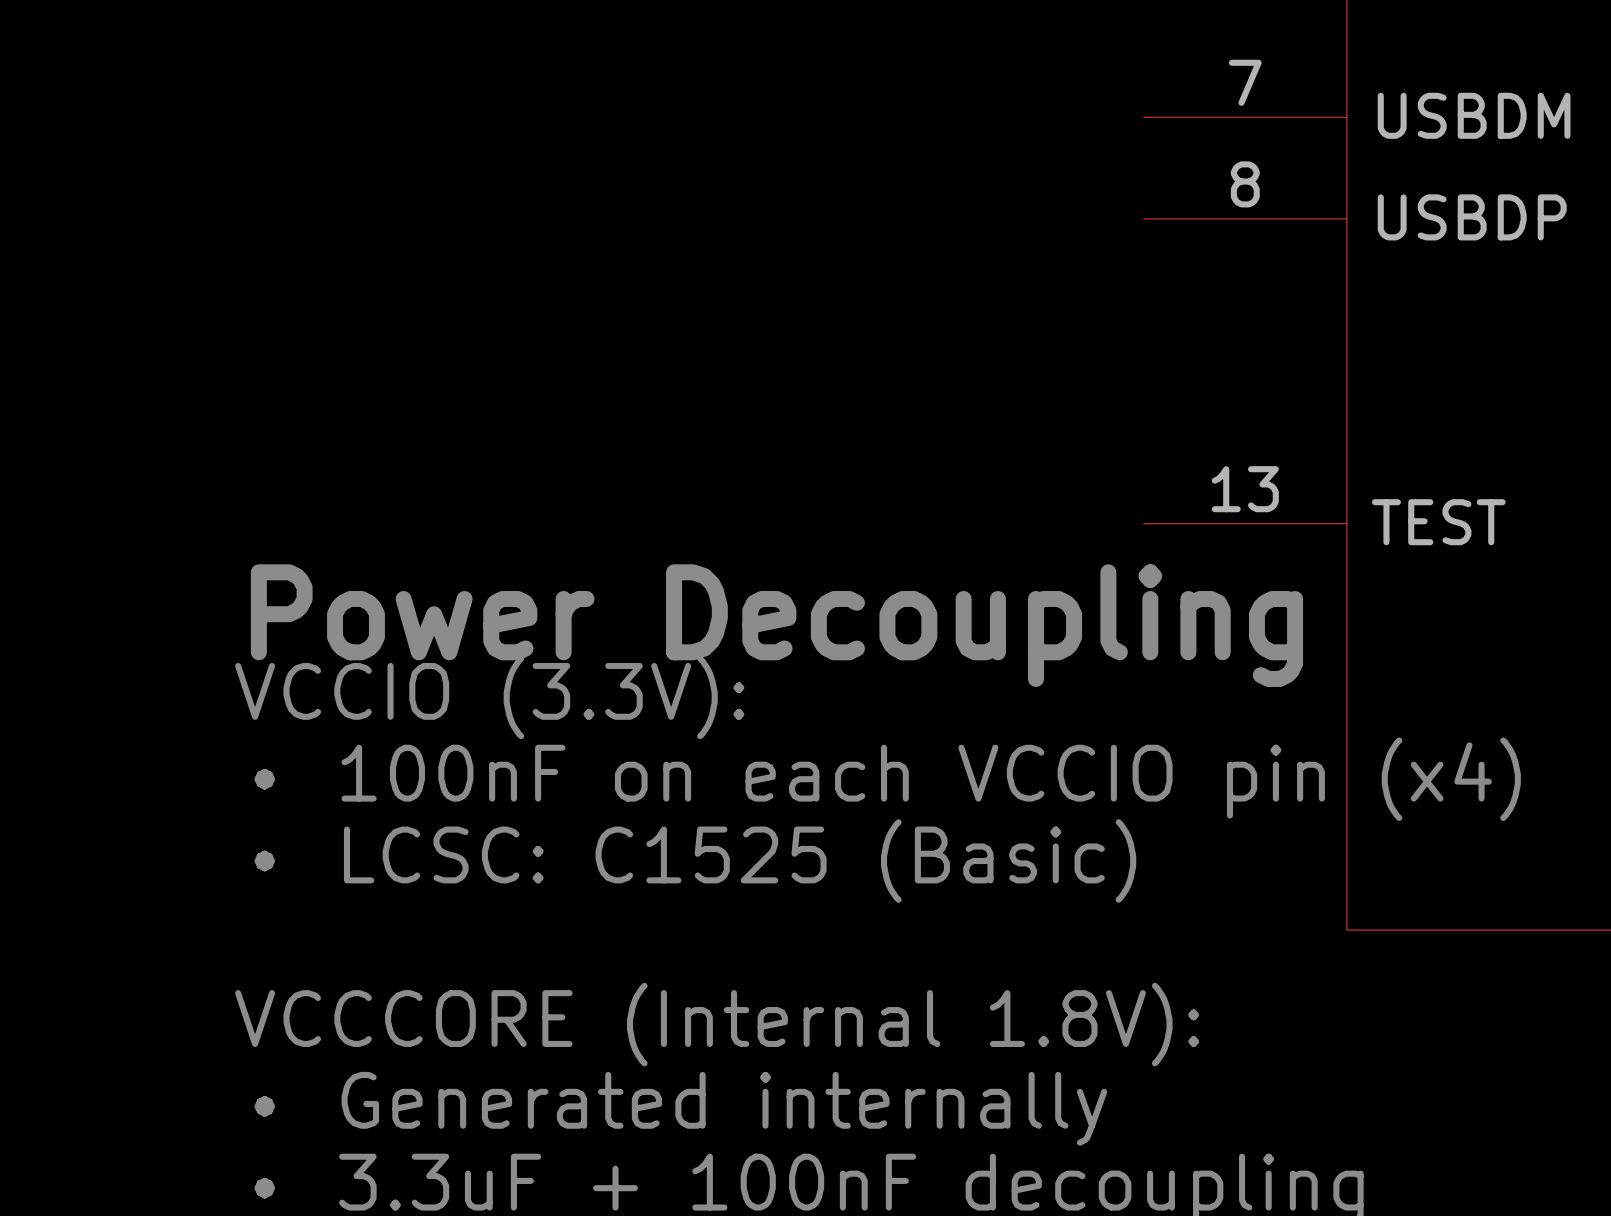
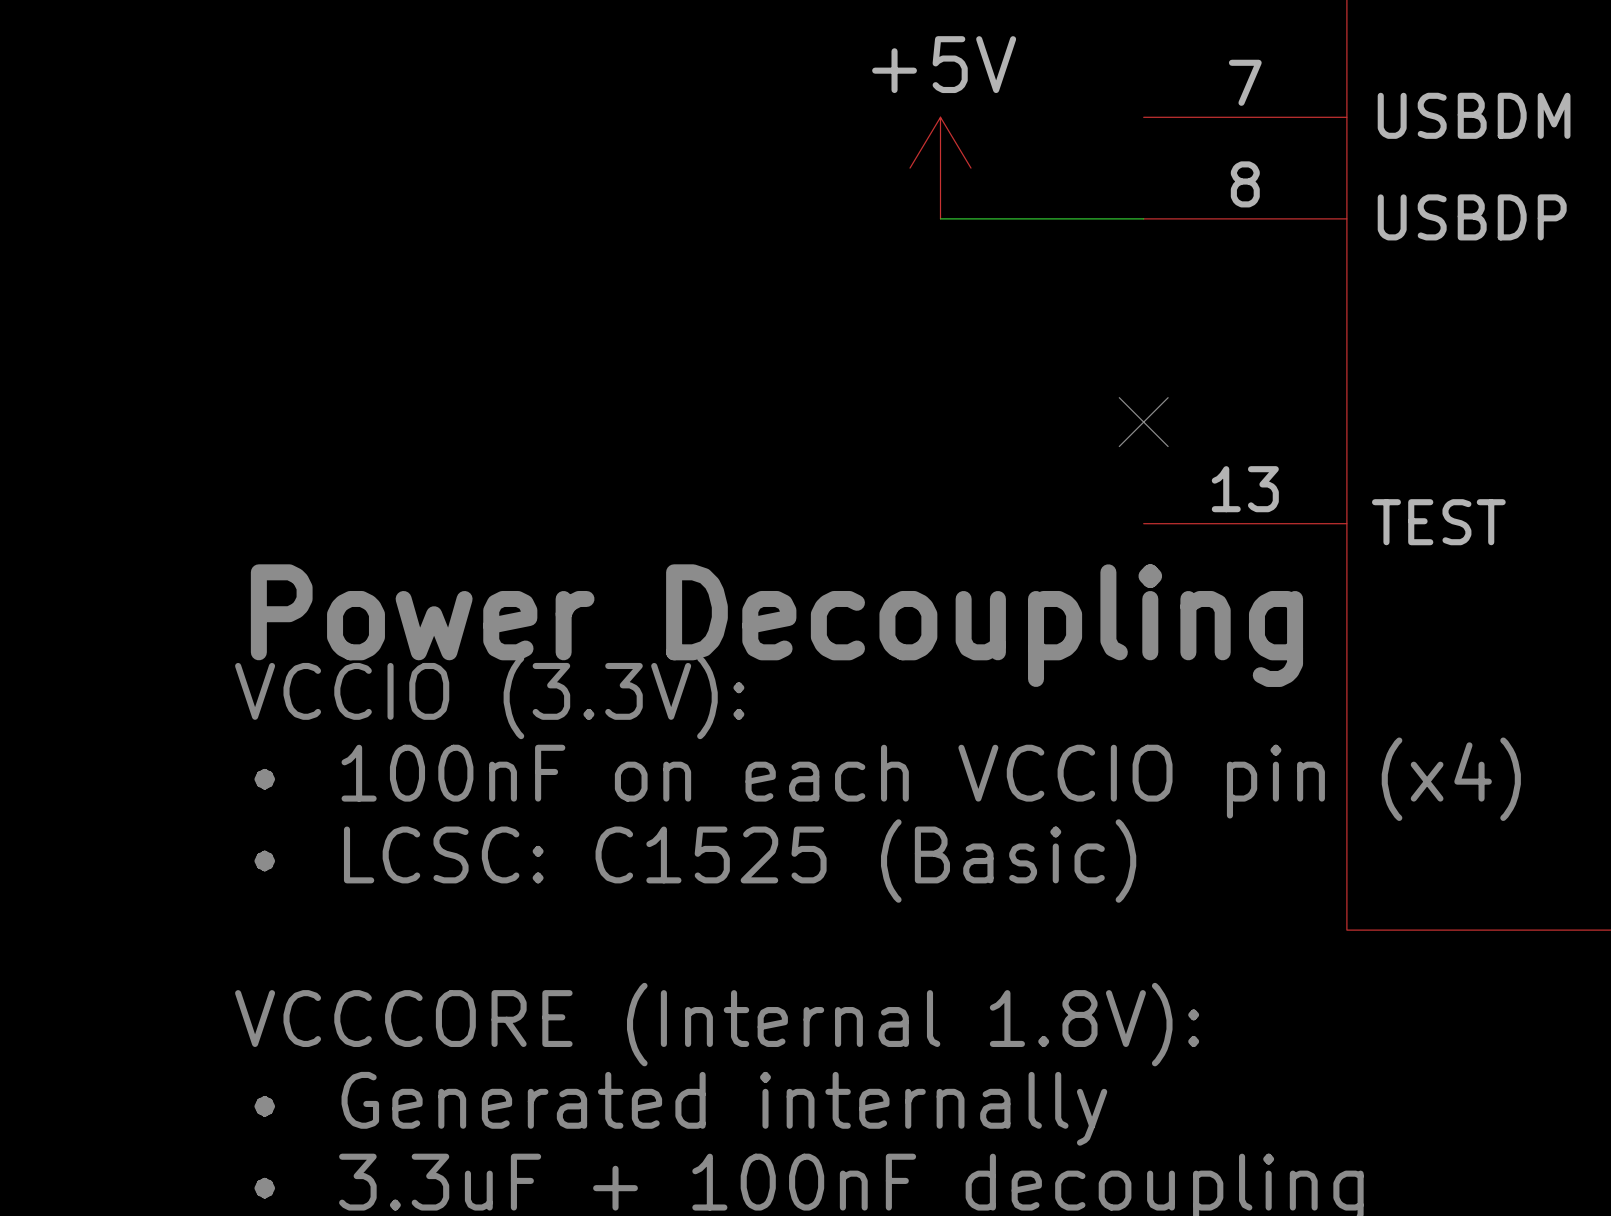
power symbol: none -> +5V (940, 168)
wire: none -> (940, 218) (1143, 218)
no-connect mark: none -> (1143, 422)

